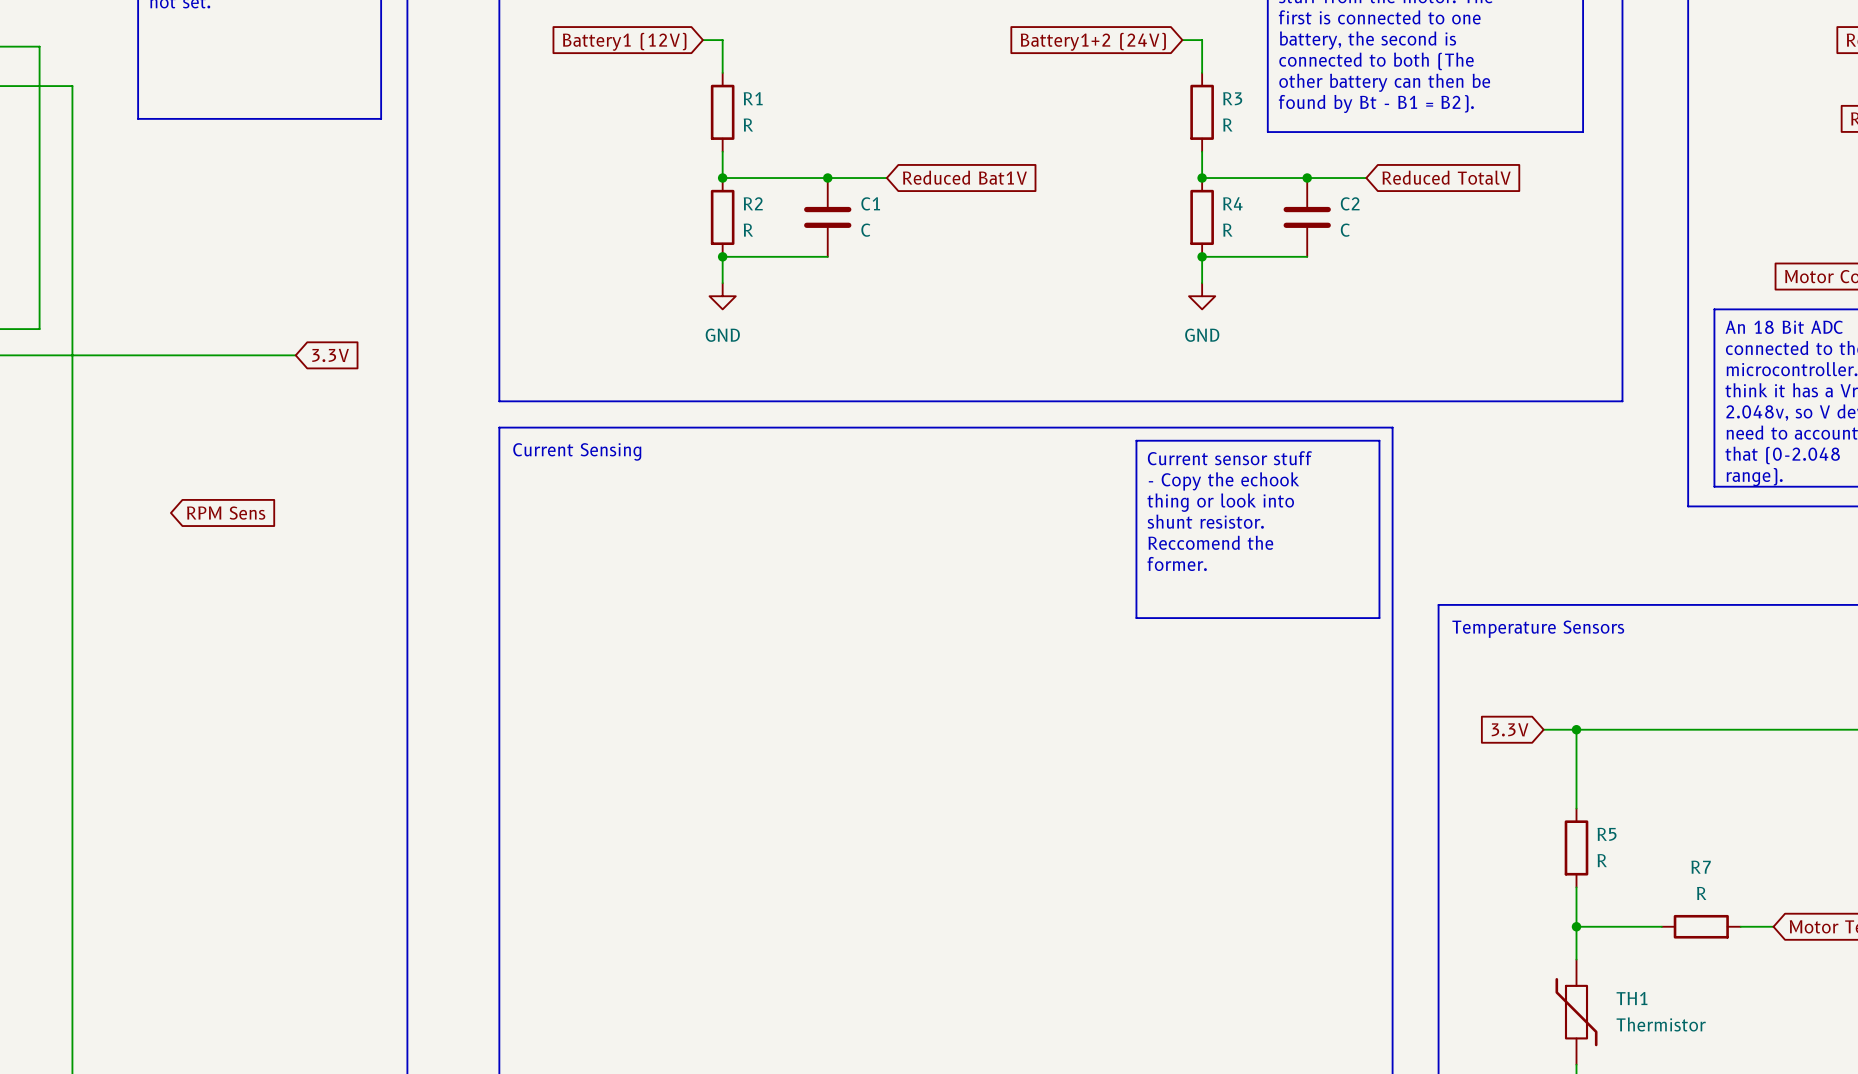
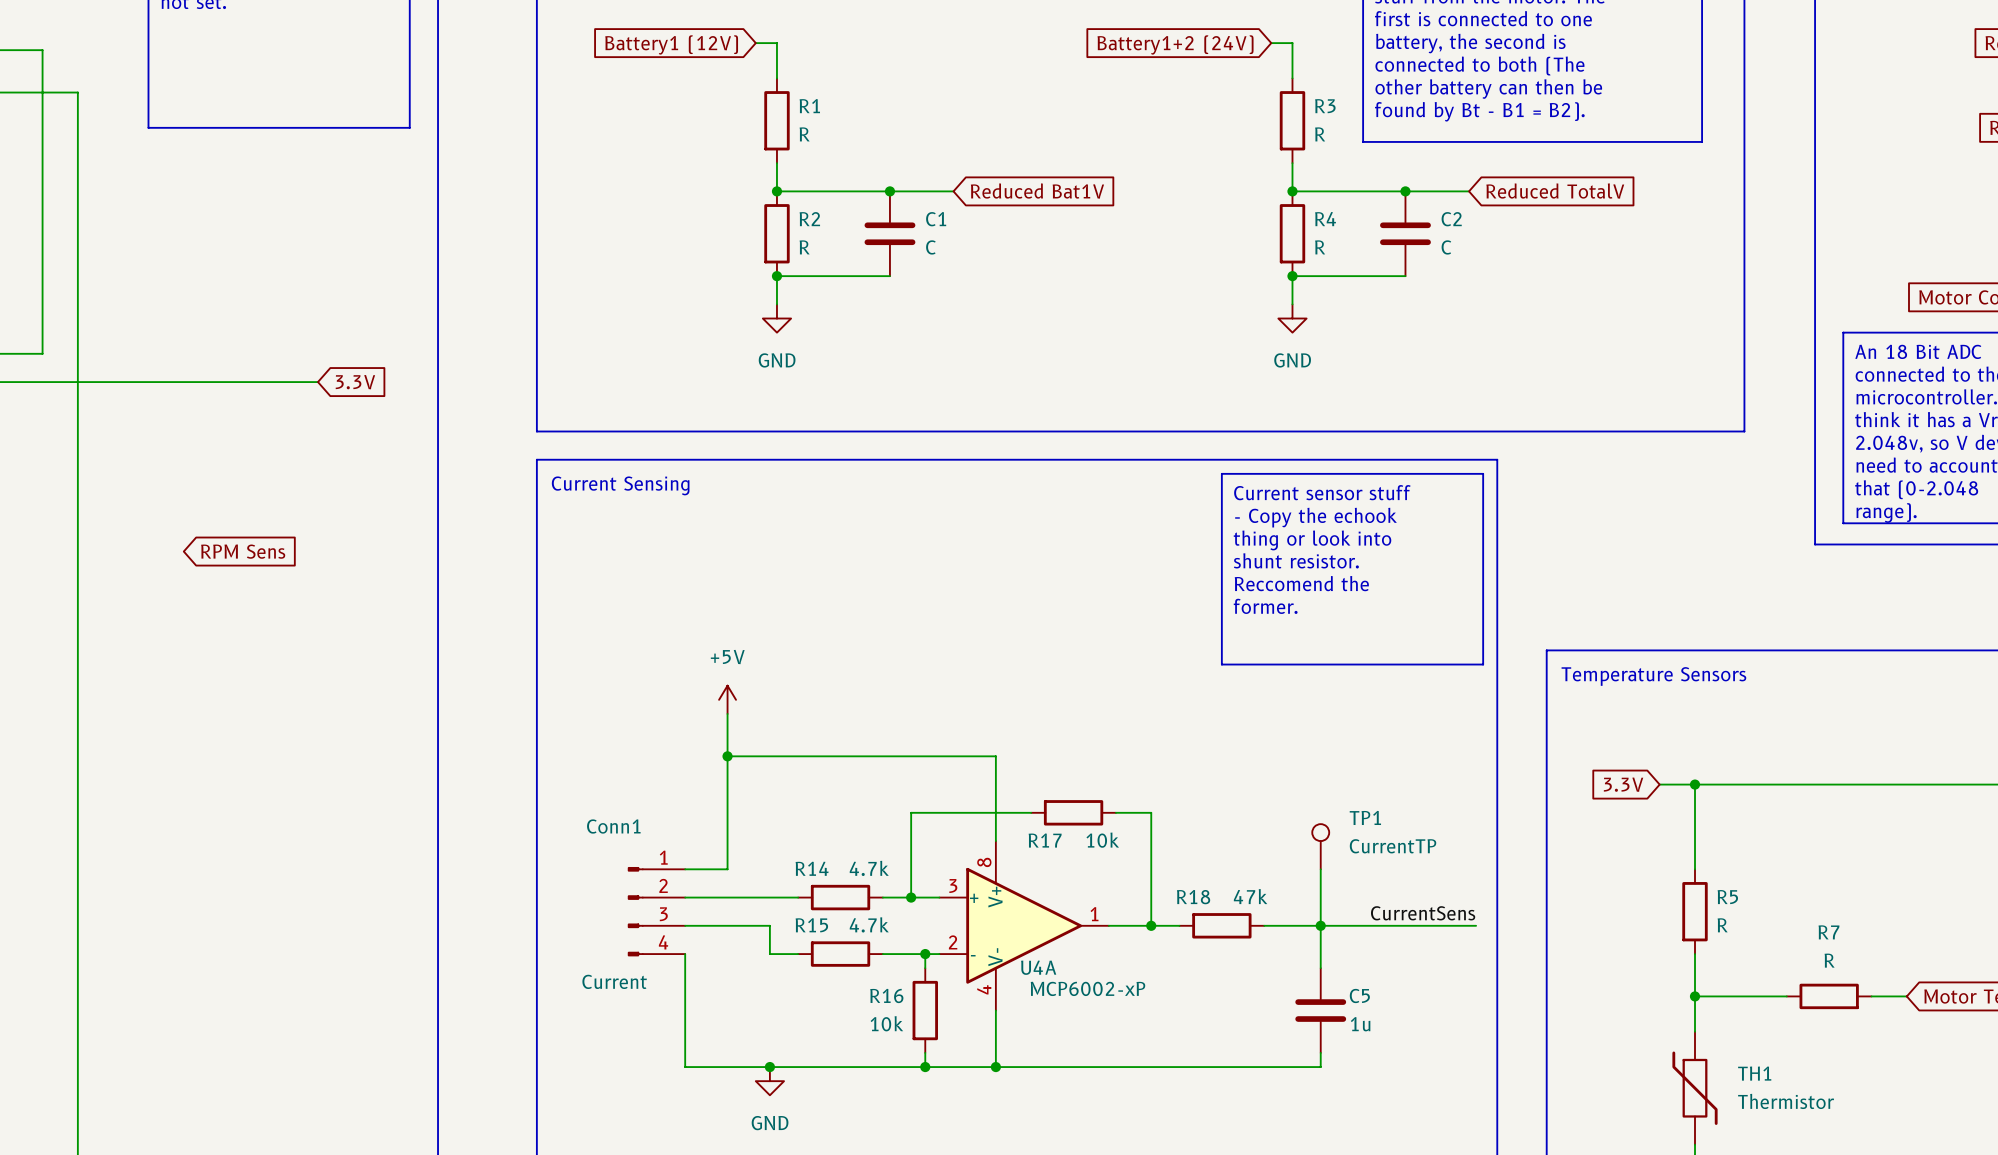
power symbol: none -> +5V (727, 699)
wire: none -> (727, 713) (727, 869) (685, 869)
wire: none -> (727, 756) (995, 756) (995, 841)
junction: none -> (727, 756)
wire: none -> (1031, 812) (911, 812) (911, 897)
R17: none -> 10k (1073, 812)
wire: none -> (1115, 812) (1151, 812) (1151, 925)
TP1: none -> CurrentTP (1320, 846)
wire: none -> (1320, 869) (1320, 968)
wire: none -> (685, 897) (798, 897)
R14: none -> 4.7k (840, 897)
wire: none -> (882, 897) (939, 897)
junction: none -> (911, 897)
Conn1: none -> Current (656, 911)
label: none -> CurrentSens (1423, 913)
wire: none -> (685, 925) (769, 925) (769, 954) (798, 954)
part: none -> (995, 925)
U4A: none -> MCP6002-xP (1024, 925)
wire: none -> (1108, 925) (1179, 925)
junction: none -> (1151, 925)
R18: none -> 47k (1221, 925)
wire: none -> (1264, 925) (1476, 925)
junction: none -> (1320, 925)
wire: none -> (685, 954) (685, 1067) (1320, 1067) (1320, 1052)
R15: none -> 4.7k (840, 954)
wire: none -> (882, 954) (939, 954)
wire: none -> (925, 954) (925, 968)
junction: none -> (925, 954)
R16: none -> 10k (925, 1010)
wire: none -> (995, 1010) (995, 1067)
C5: none -> 1u (1320, 1010)
wire: none -> (925, 1052) (925, 1067)
junction: none -> (769, 1067)
junction: none -> (925, 1067)
junction: none -> (995, 1067)
power symbol: none -> GND (769, 1081)

